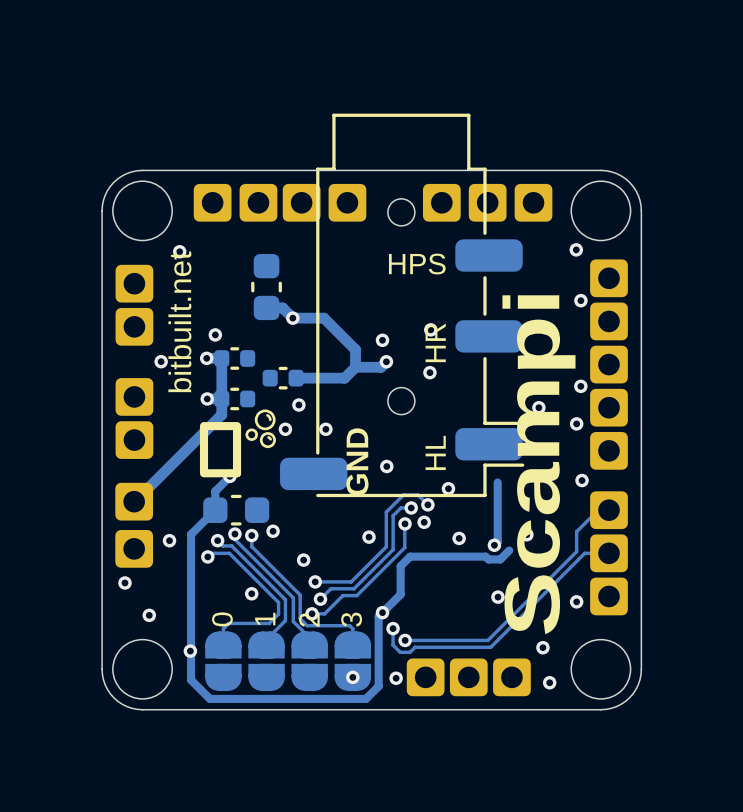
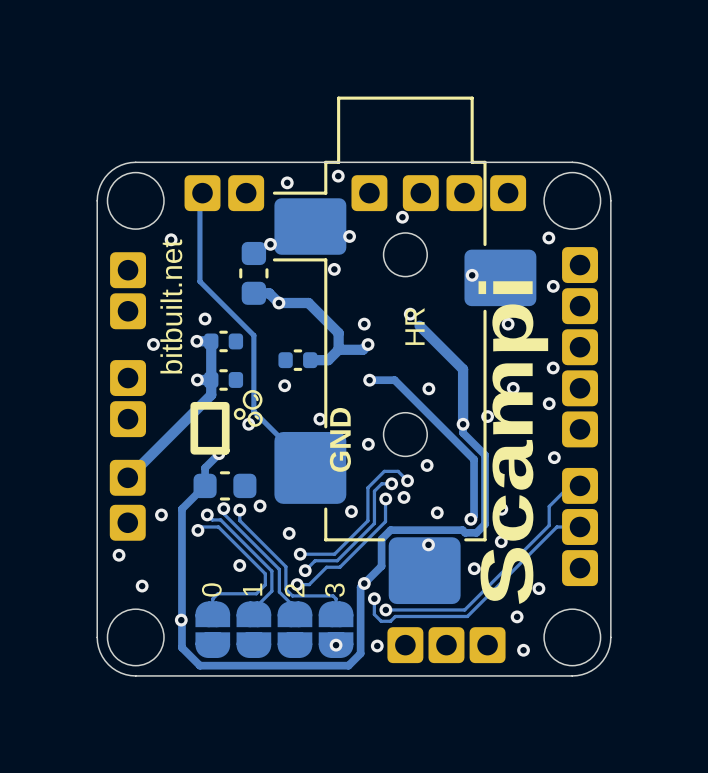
via: none -> (338, 176)
via: none -> (287, 182)
track: none -> (199, 193) (199, 281) (253, 335) (253, 411) (310, 467)
part: (301, 202) -> none
part position: (347, 202) -> (369, 193)
via: none -> (402, 217)
via: none -> (349, 236)
via: none -> (270, 244)
text: HPS (417, 264) -> none
via: none -> (334, 269)
via: none -> (472, 275)
part: (402, 305) -> none
via: none -> (508, 324)
track: none -> (419, 325) (463, 369) (463, 424)
part: none -> (404, 350)
via: (429, 372) -> none
part position: (283, 378) -> (297, 360)
track: (325, 378) (296, 378) -> none
track: none -> (369, 380) (394, 380) (474, 459)
via: none -> (369, 380)
via: none -> (428, 388)
via: (285, 429) -> none
via position: (325, 429) -> (319, 419)
via: none -> (487, 416)
via: none -> (248, 424)
via: none -> (463, 424)
text: HL (435, 452) -> none
track: none -> (463, 433) (485, 454) (485, 524)
via: none -> (501, 541)
via: none -> (428, 544)
via position: (576, 601) -> (538, 588)

